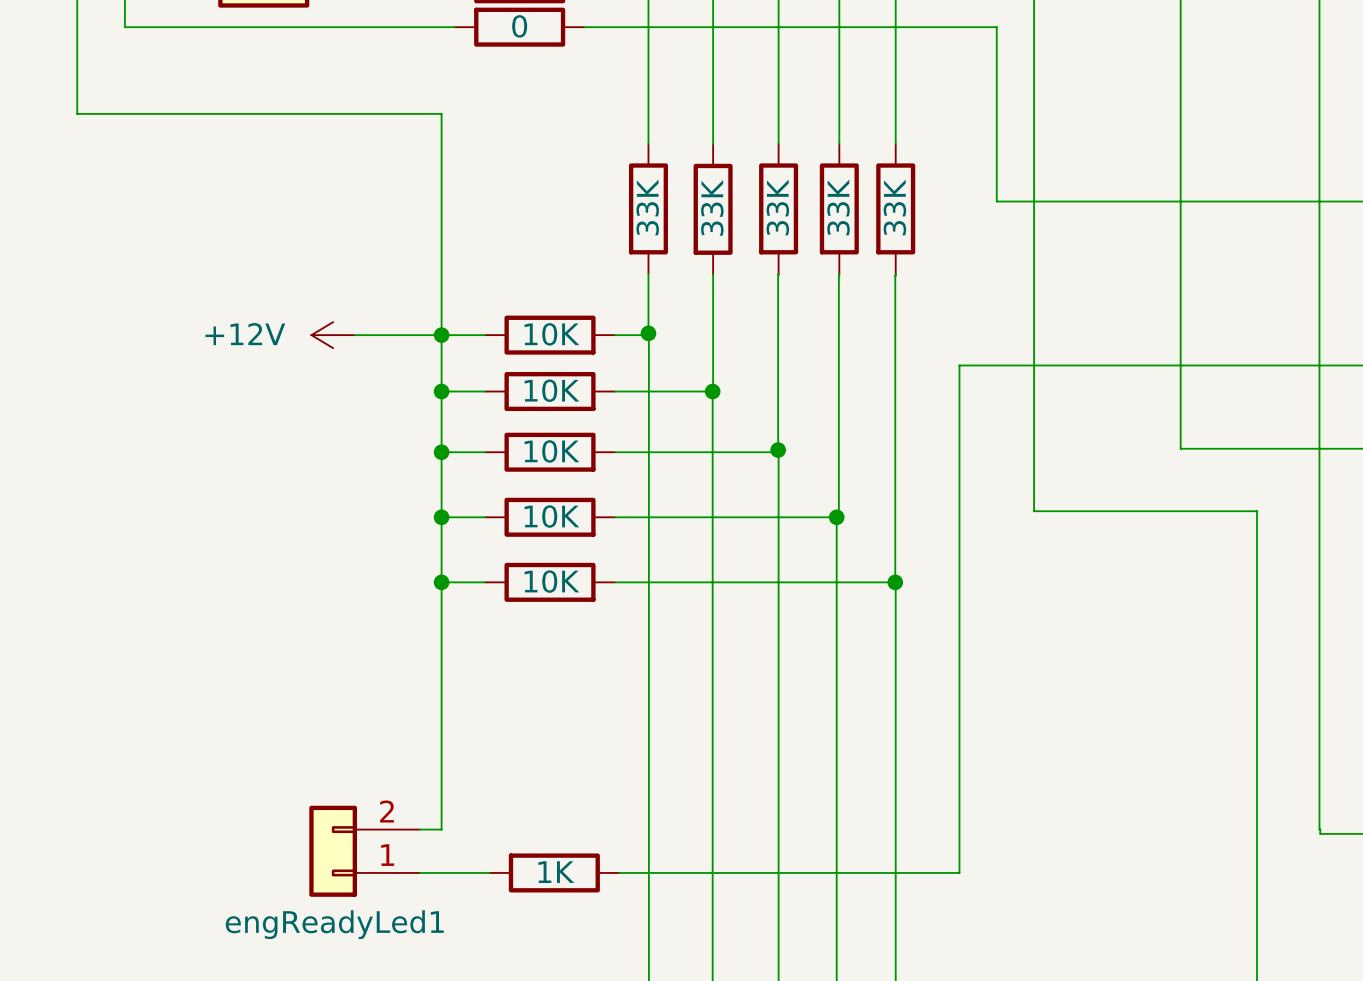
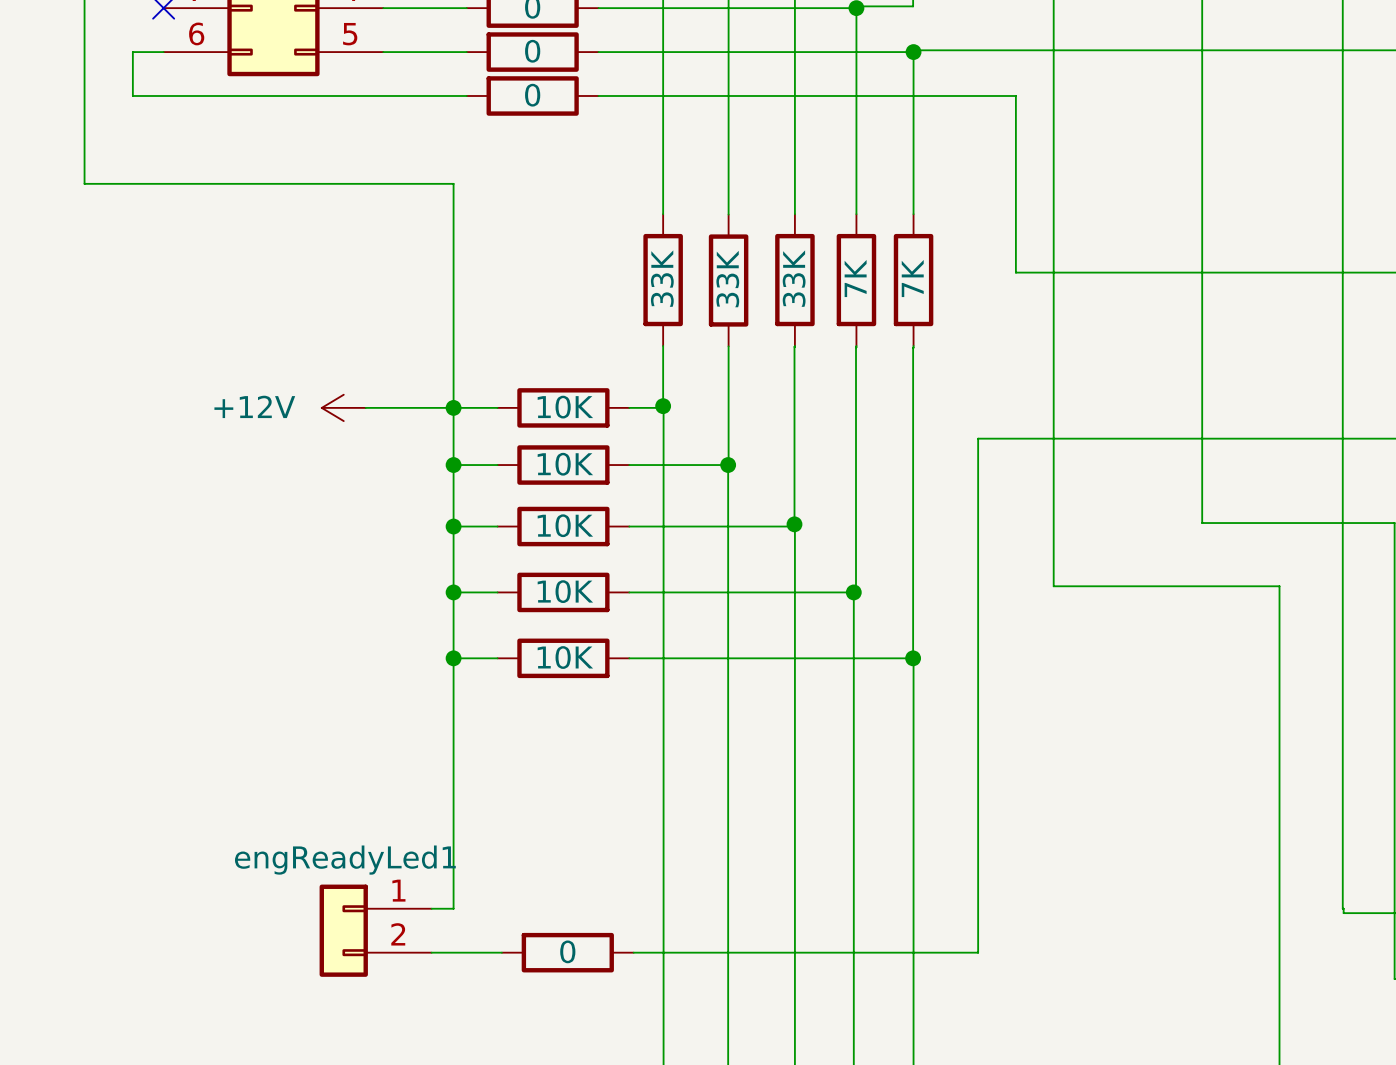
part value: 33K (838, 207) -> 7K (855, 278)
part value: 33K (894, 207) -> 7K (912, 278)
engReadyLed1 flip: as is (333, 851) -> up-down (343, 930)
part value: 1K (556, 872) -> 0 (567, 951)

